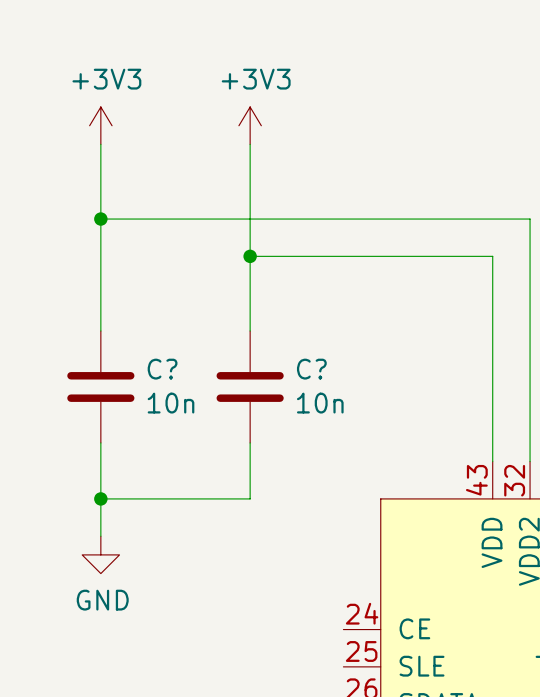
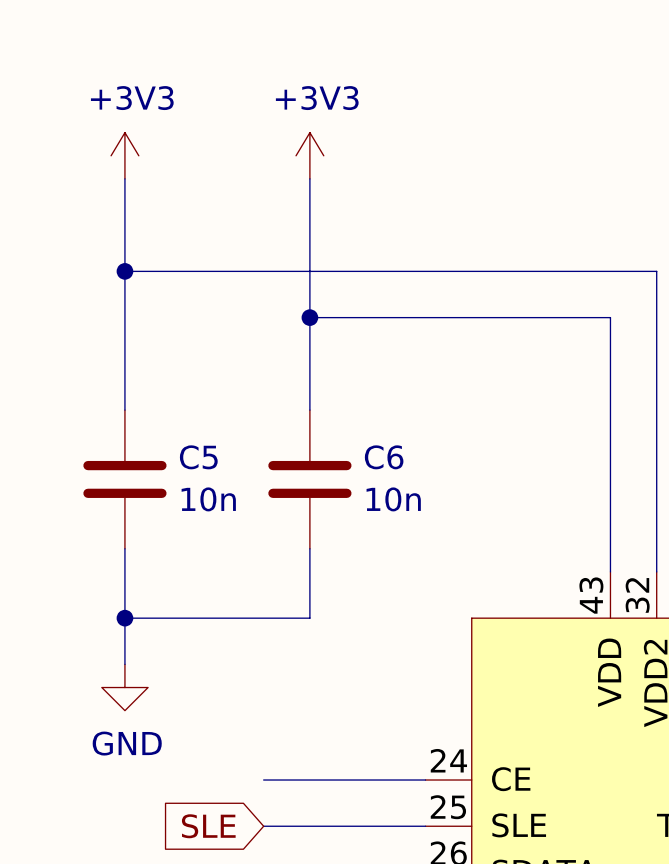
C? name: C? (162, 369) -> C5 (198, 457)
C? name: C? (311, 369) -> C6 (384, 457)
wire: none -> (263, 780) (425, 780)
global label: none -> SLE (208, 826)
wire: none -> (263, 826) (425, 826)

